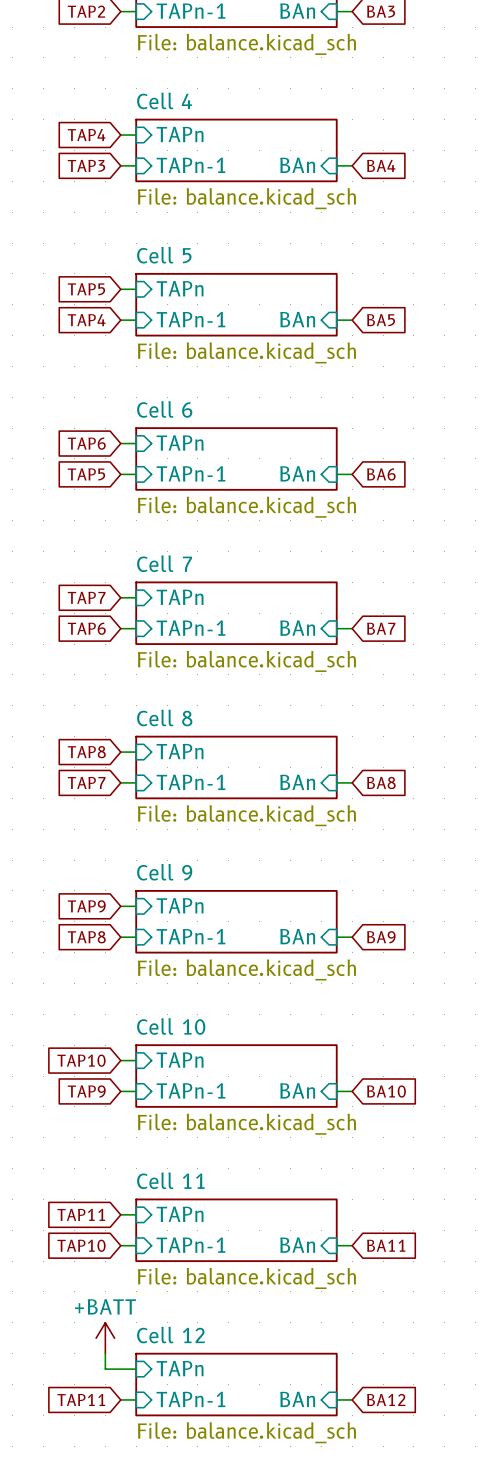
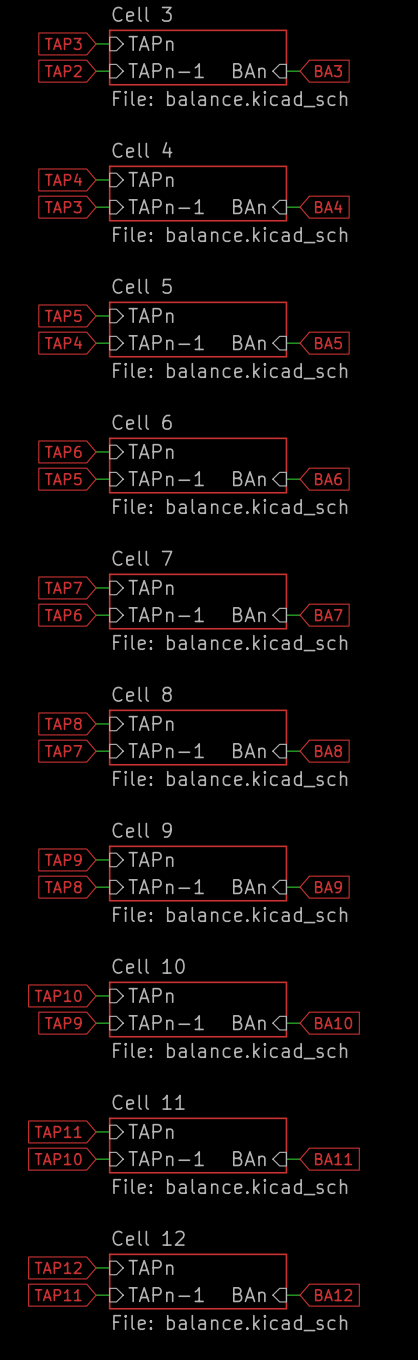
power symbol: +BATT (105, 1338) -> none
wire: (105, 1353) (105, 1369) (120, 1369) -> none
global label: none -> TAP12 (58, 1267)

